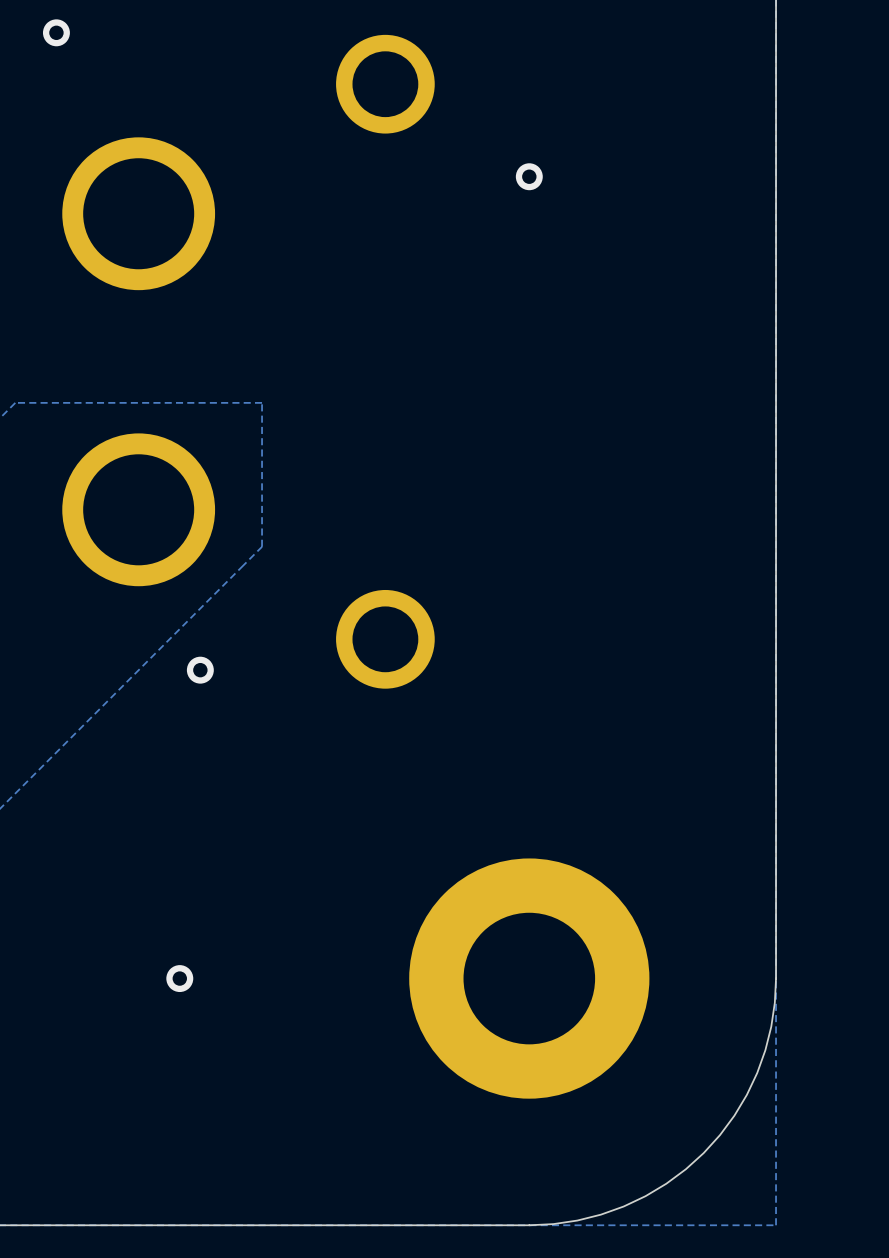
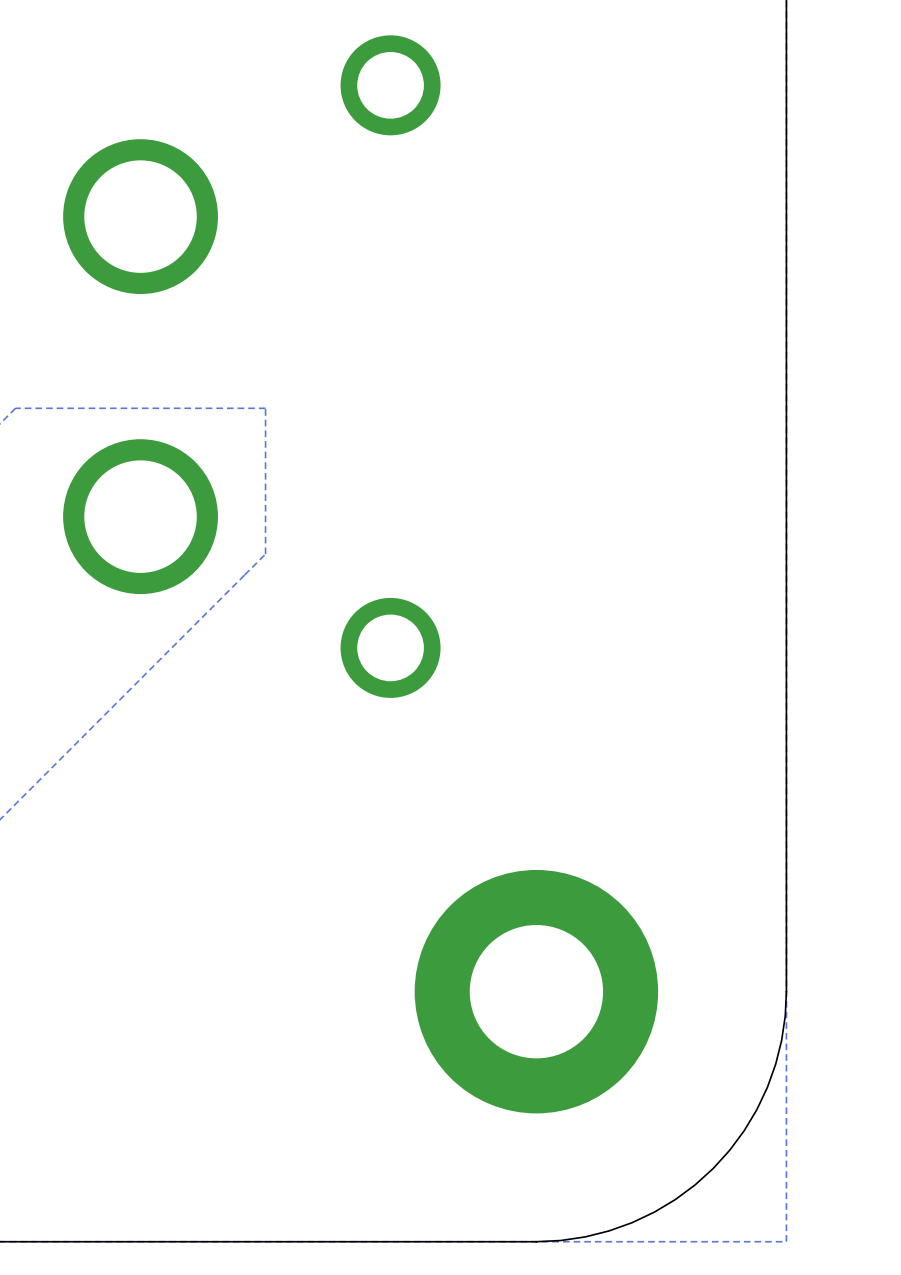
via: (56, 32) -> none
via: (529, 176) -> none
via: (200, 670) -> none
via: (179, 978) -> none

